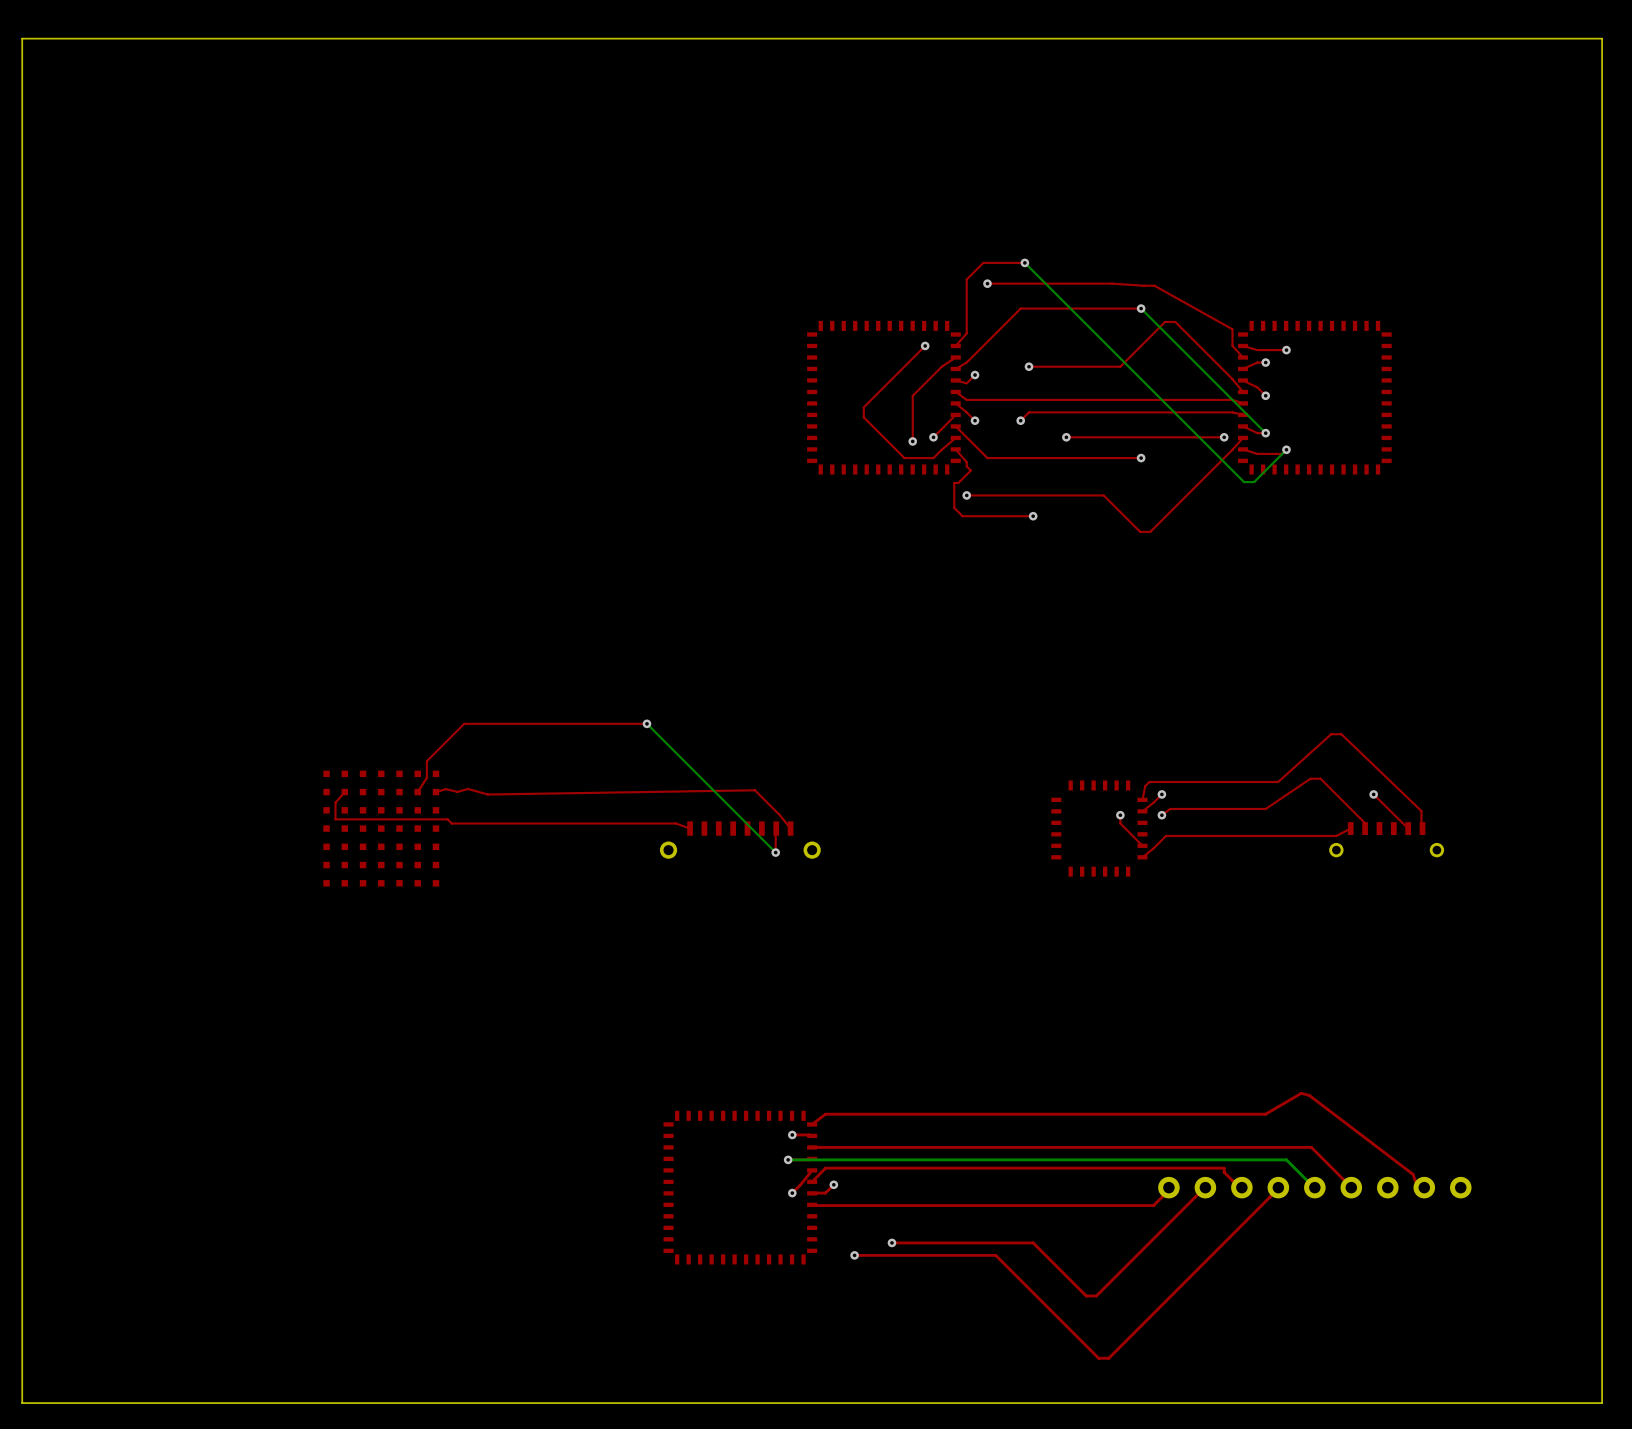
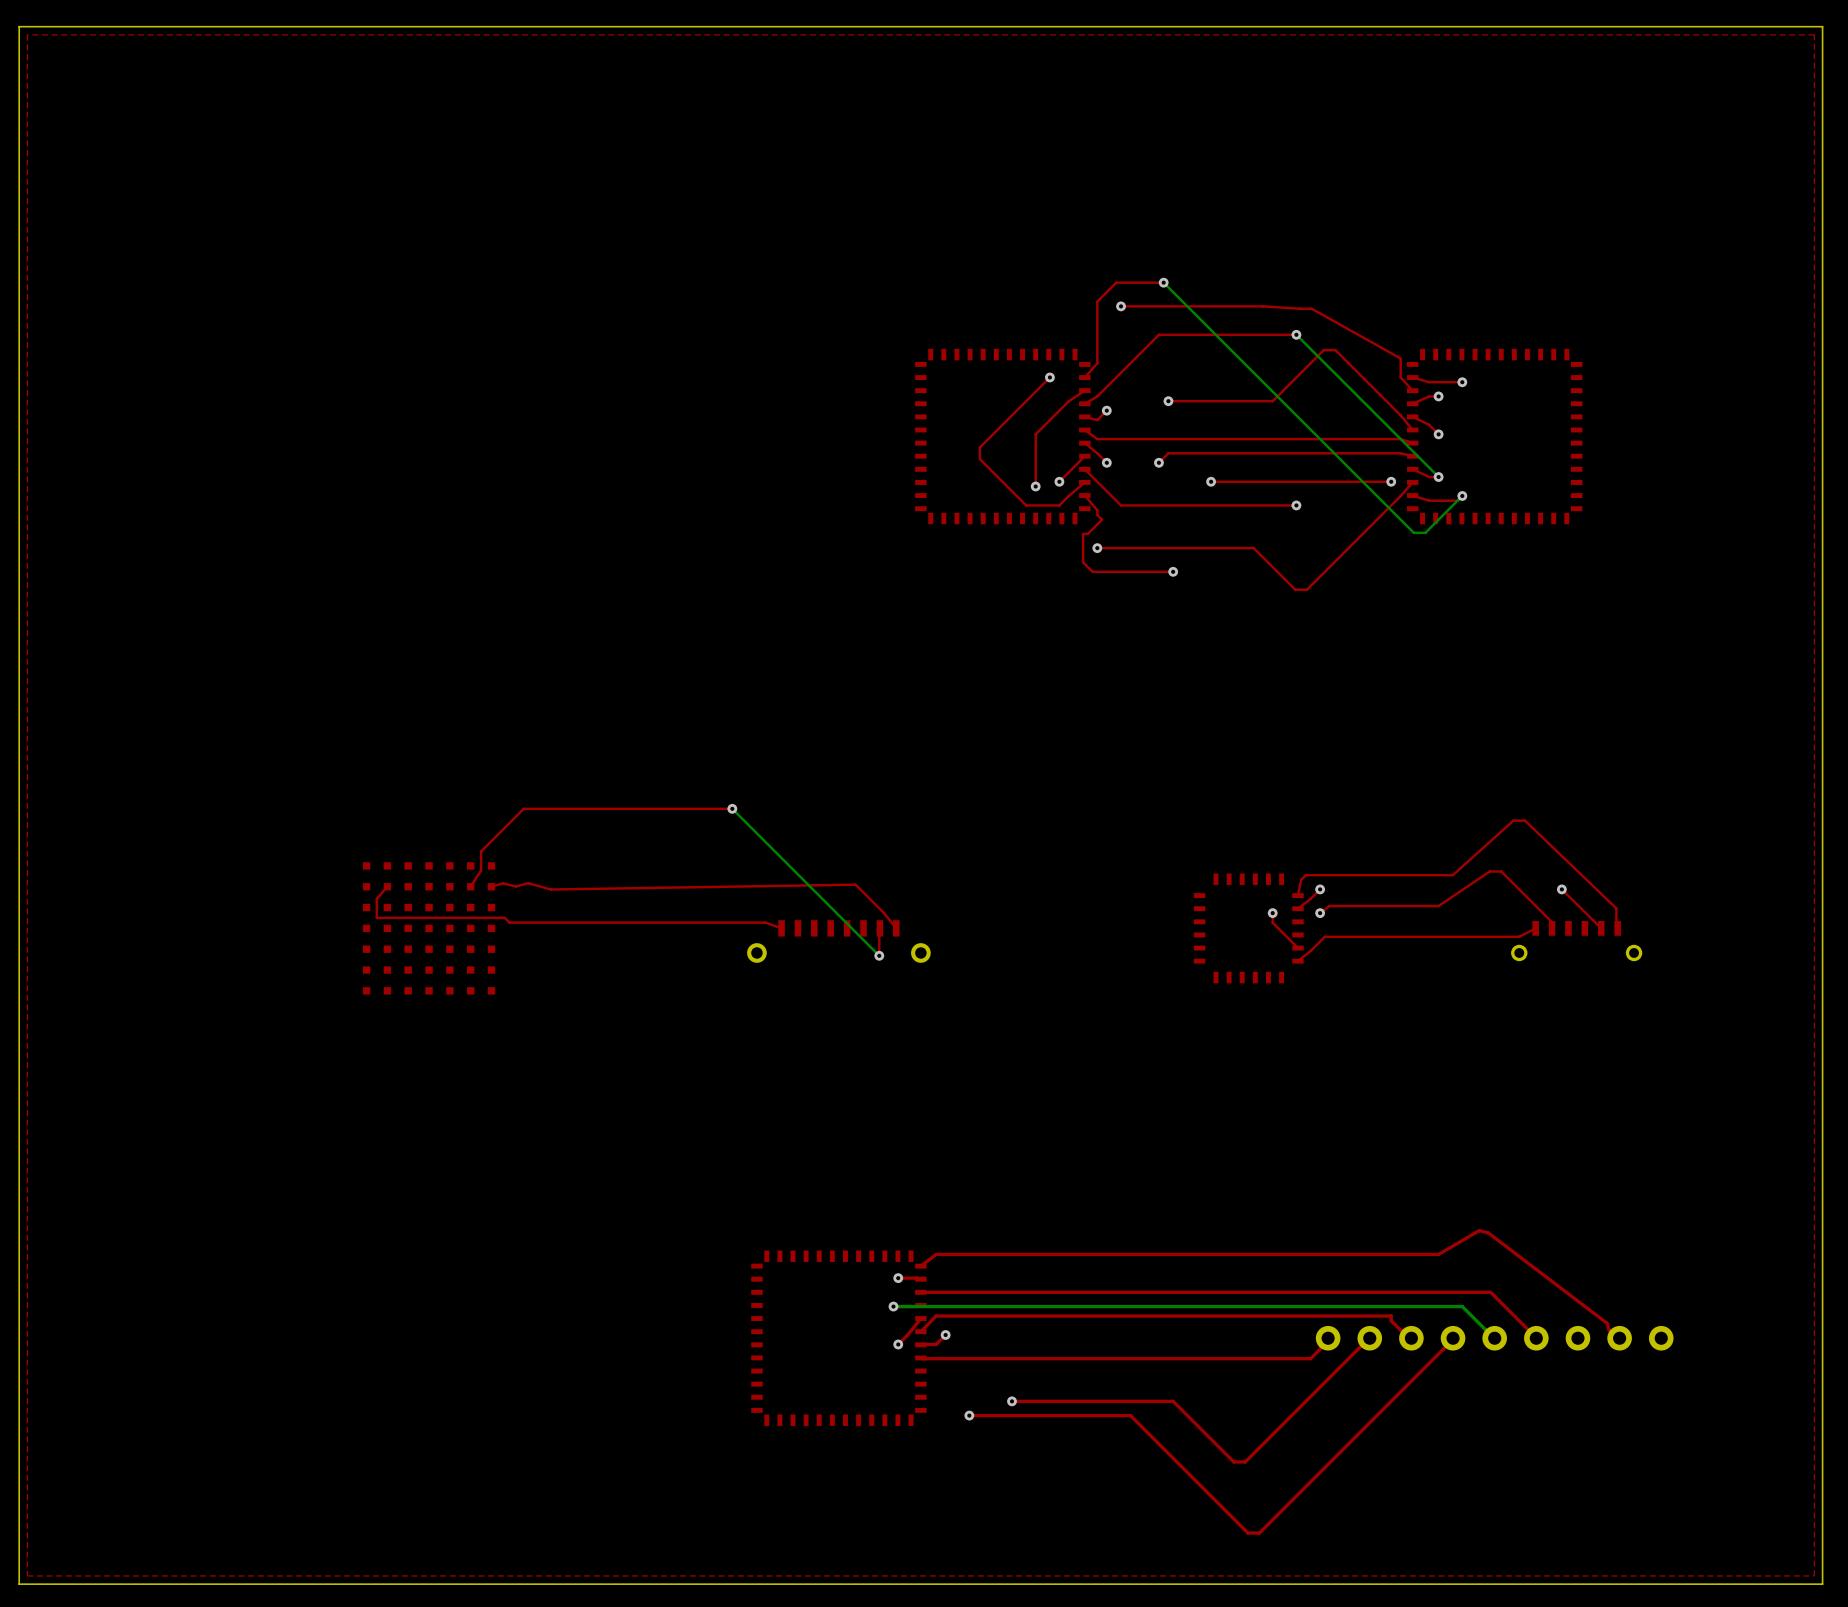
top zone outline: none -> (1814, 34) (27, 34) (27, 1575) (1814, 1575) (1814, 34)

